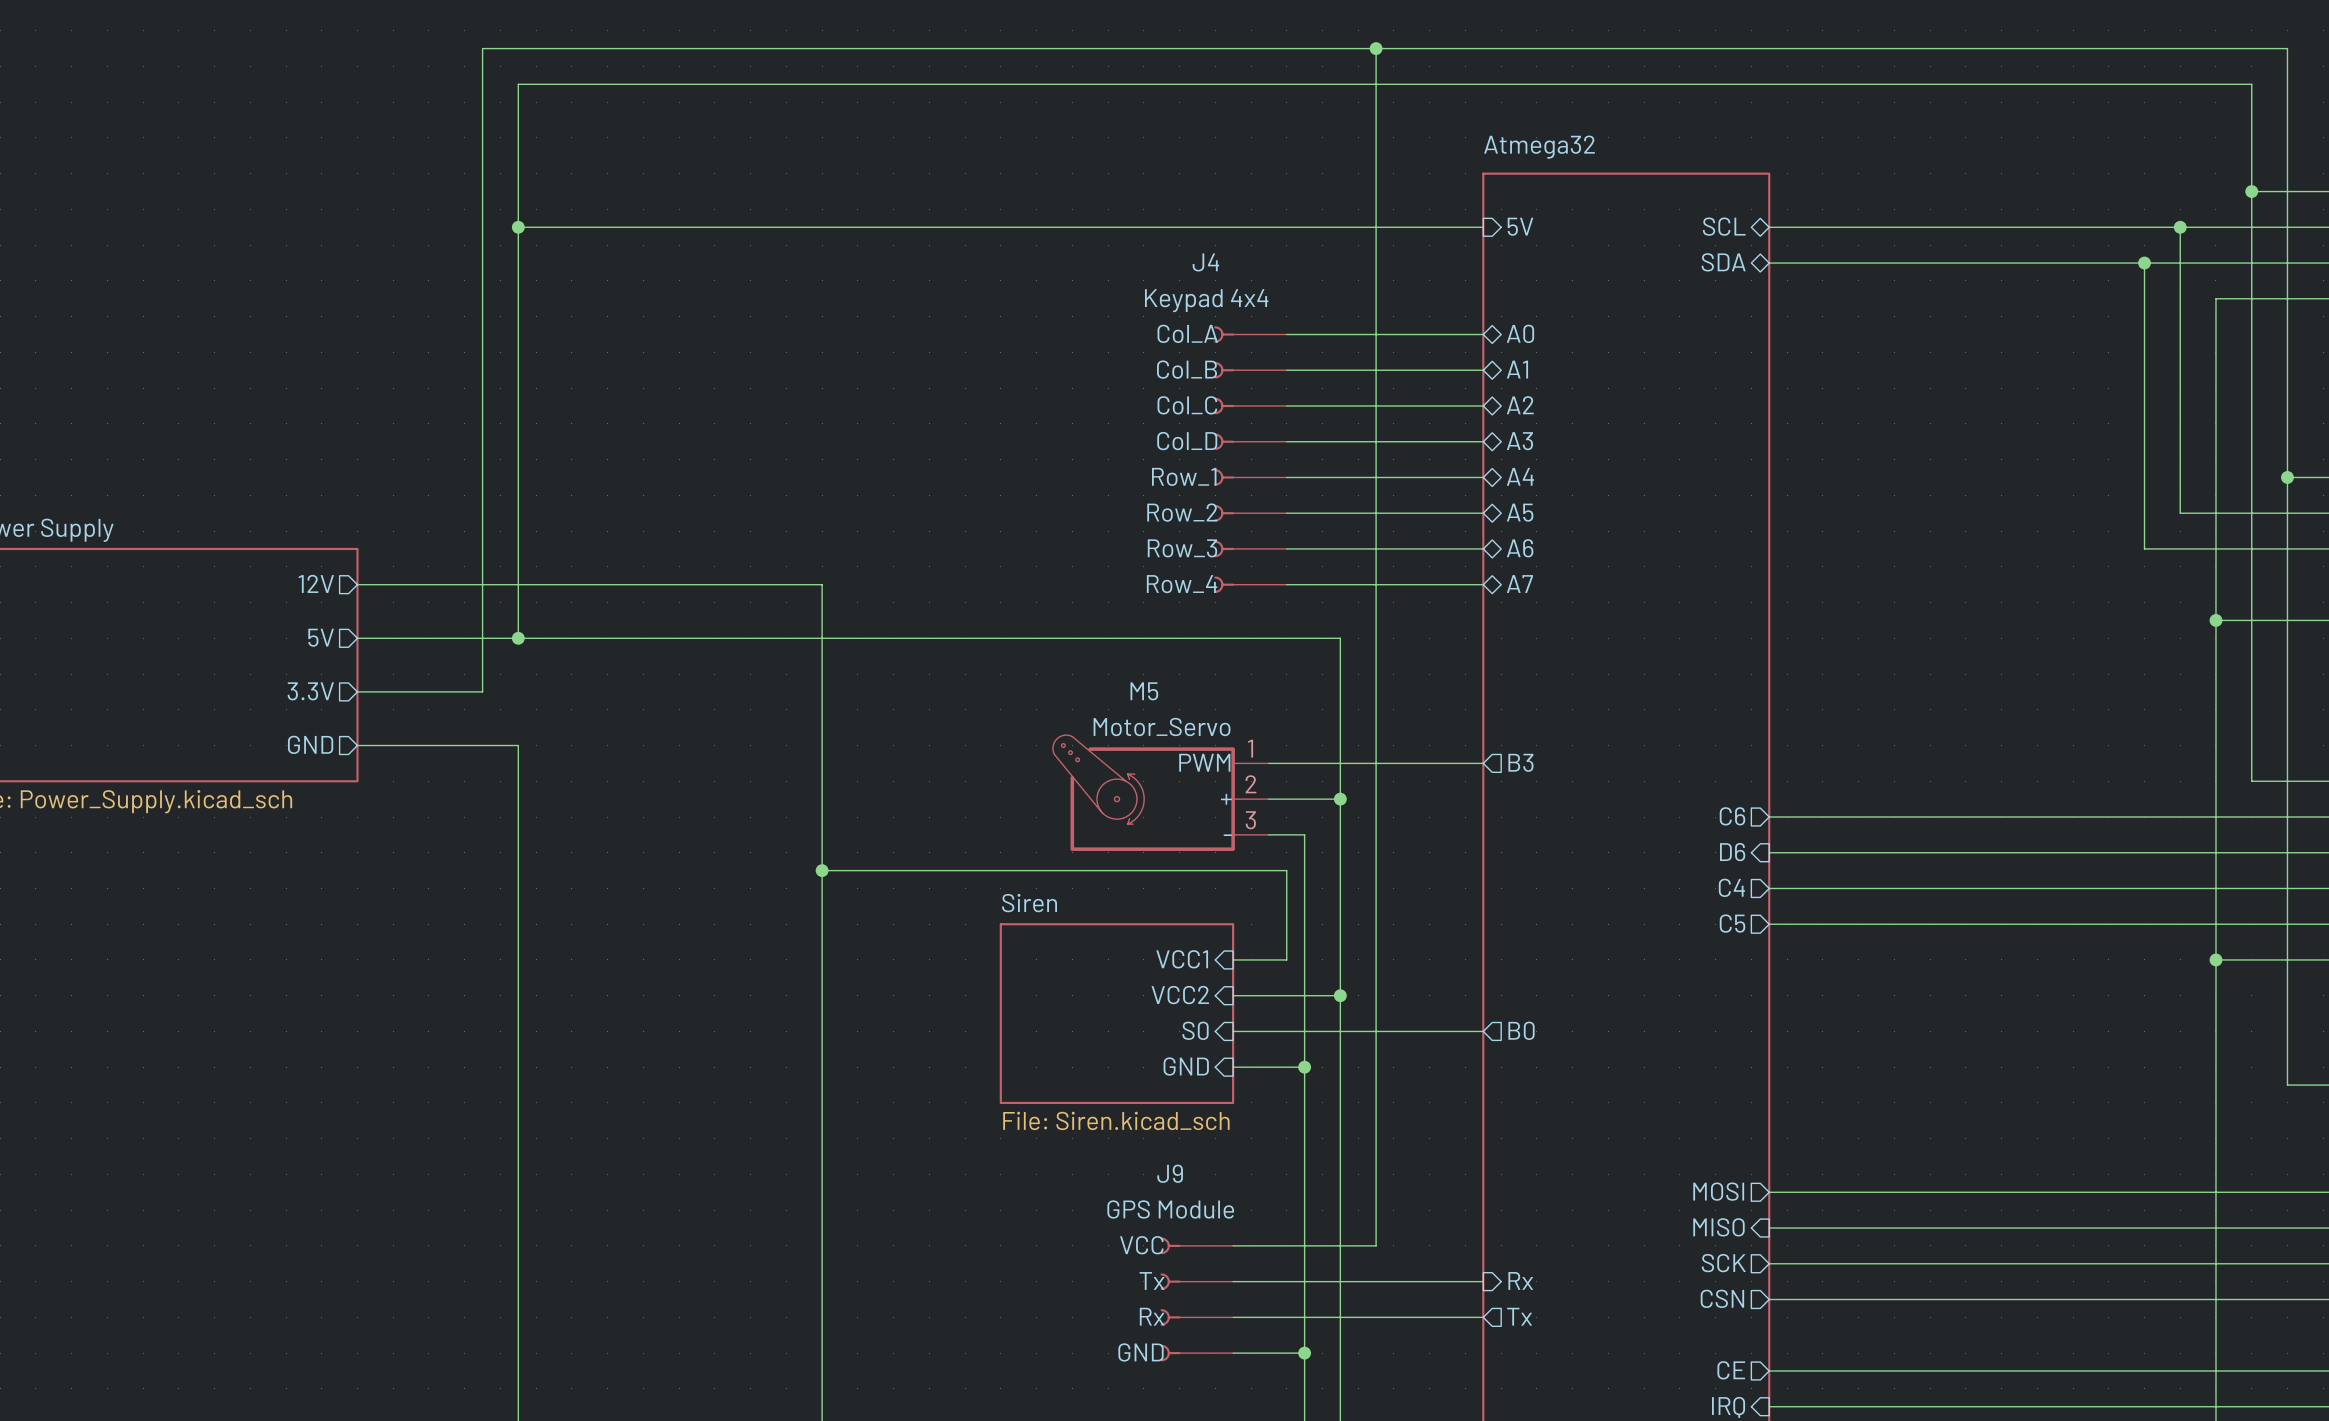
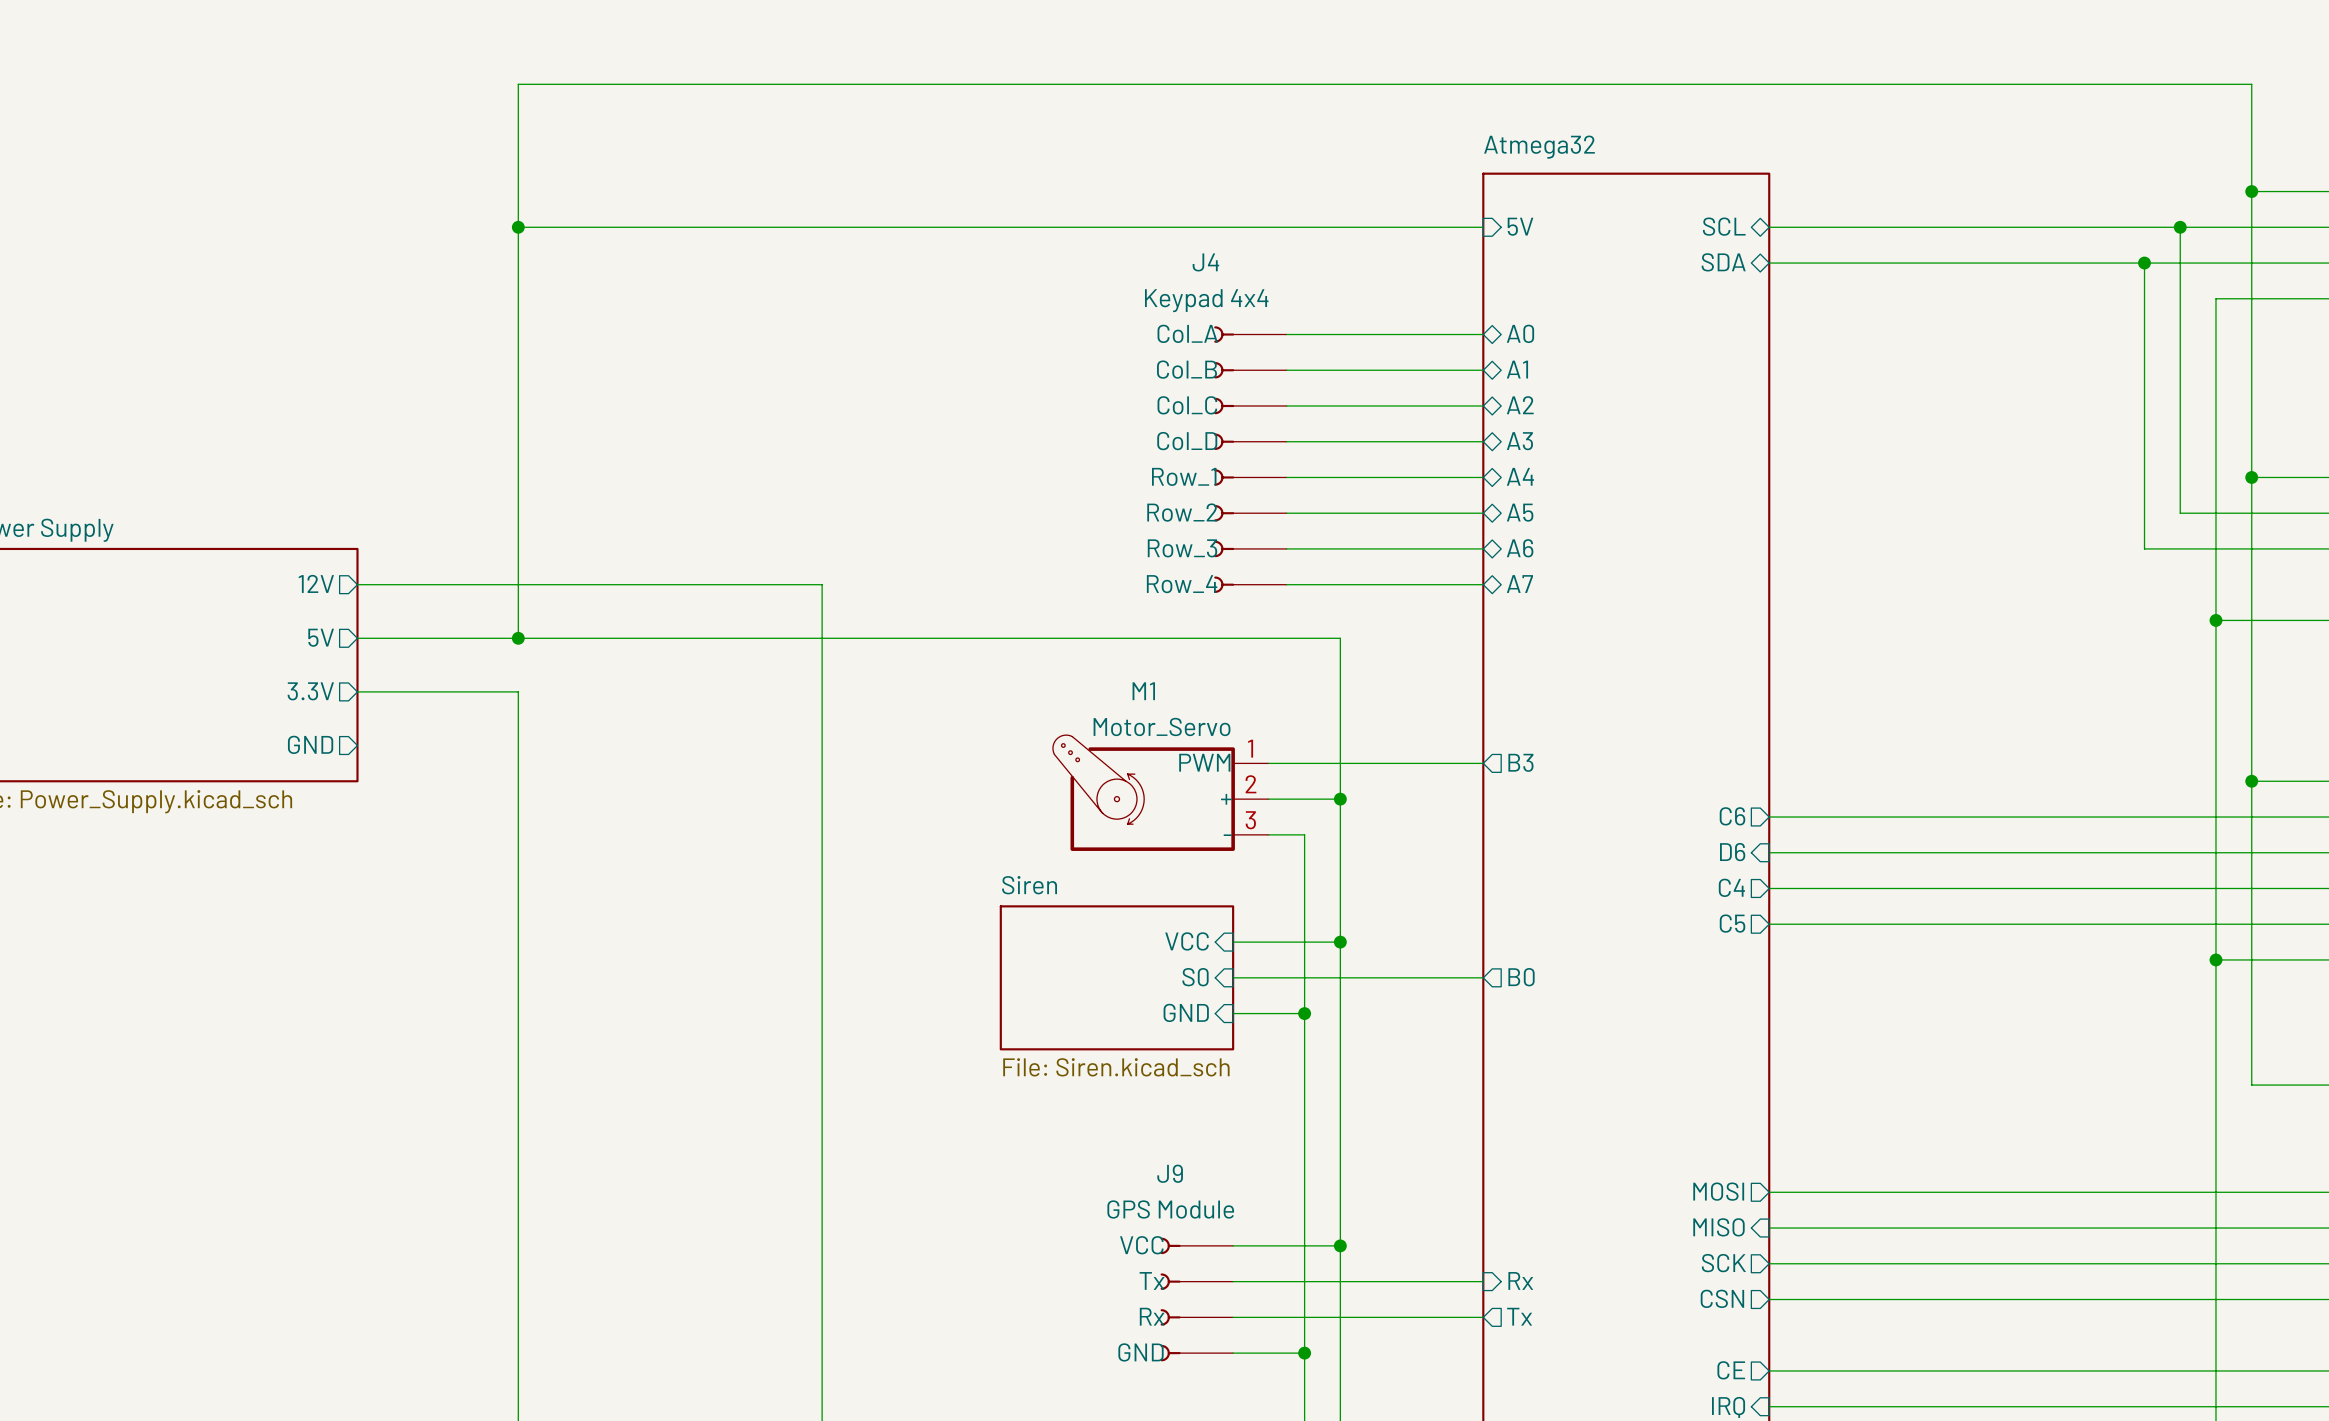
wire: (1376, 48) (1376, 1245) (1340, 1245) -> none
junction: (1376, 48) -> none
wire: none -> (2251, 477) (2287, 477)
junction position: (2287, 477) -> (2251, 477)
wire: (482, 691) (482, 48) (2287, 48) (2287, 1085) -> (2251, 781) (2251, 1085) (2287, 1085)
M5 name: M5 (1144, 691) -> M1 (1143, 691)
wire: (357, 745) (518, 745) -> (482, 691) (518, 691) (518, 745)
junction: none -> (2251, 781)
wire: (822, 870) (1286, 870) (1286, 959) (1233, 959) -> none
junction: (822, 870) -> none
junction: none -> (1340, 942)
sheet pin: VCC1 (1182, 959) -> VCC (1187, 941)
sheet Siren: none -> File: Siren.kicad_sch (1116, 977)
sheet pin: VCC2 (1180, 995) -> none
wire: (1233, 995) (1340, 995) -> (1233, 942) (1340, 942)
junction: (1340, 995) -> none
sheet Siren: File: Siren.kicad_sch (1116, 1013) -> none
junction: none -> (1304, 1013)
sheet pin position: S0 (1195, 1030) -> S0 (1195, 977)
sheet pin position: B0 (1521, 1030) -> B0 (1521, 977)
wire: (1233, 1031) (1483, 1031) -> (1233, 977) (1483, 977)
sheet pin position: GND (1186, 1066) -> GND (1186, 1012)
wire: (1233, 1067) (1304, 1067) -> (1233, 1013) (1304, 1013)
junction: (1304, 1067) -> none
junction: none -> (1340, 1245)

